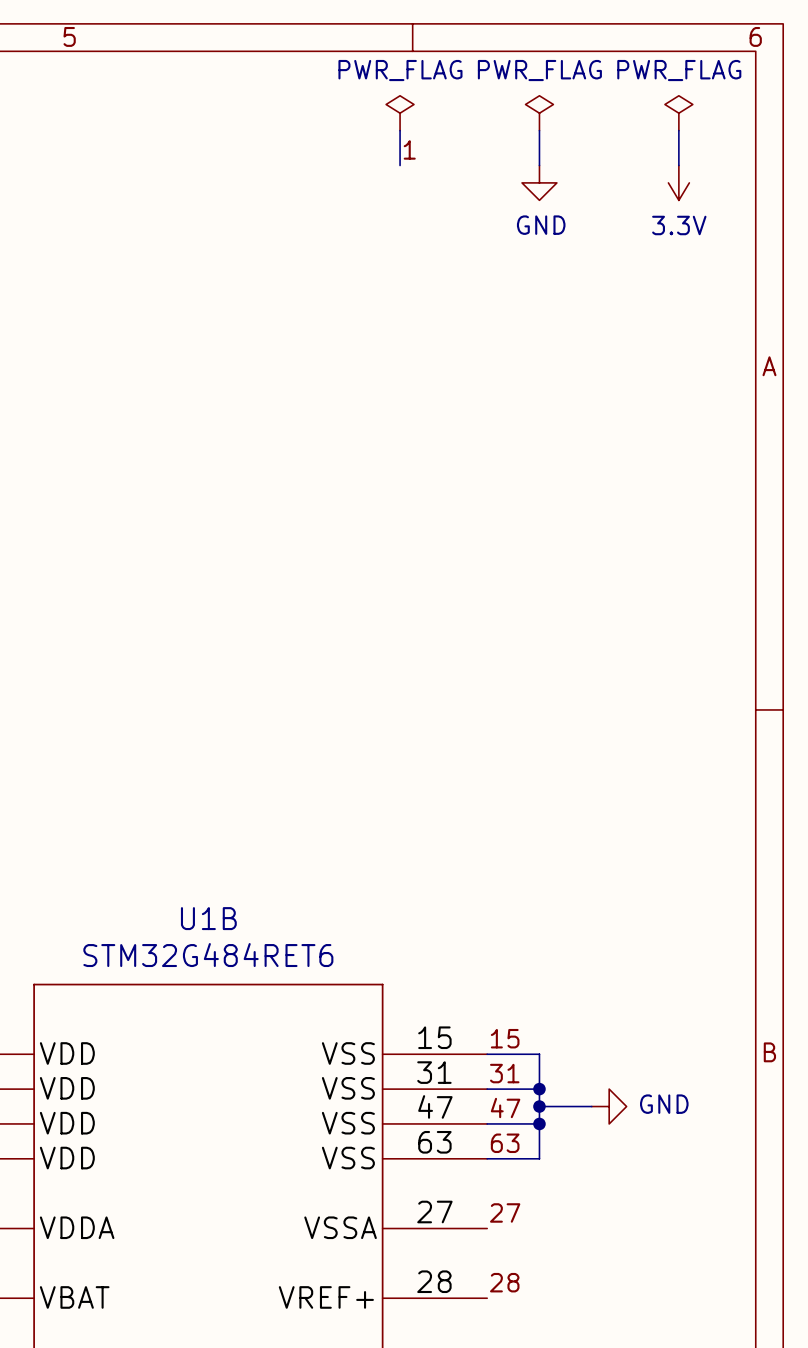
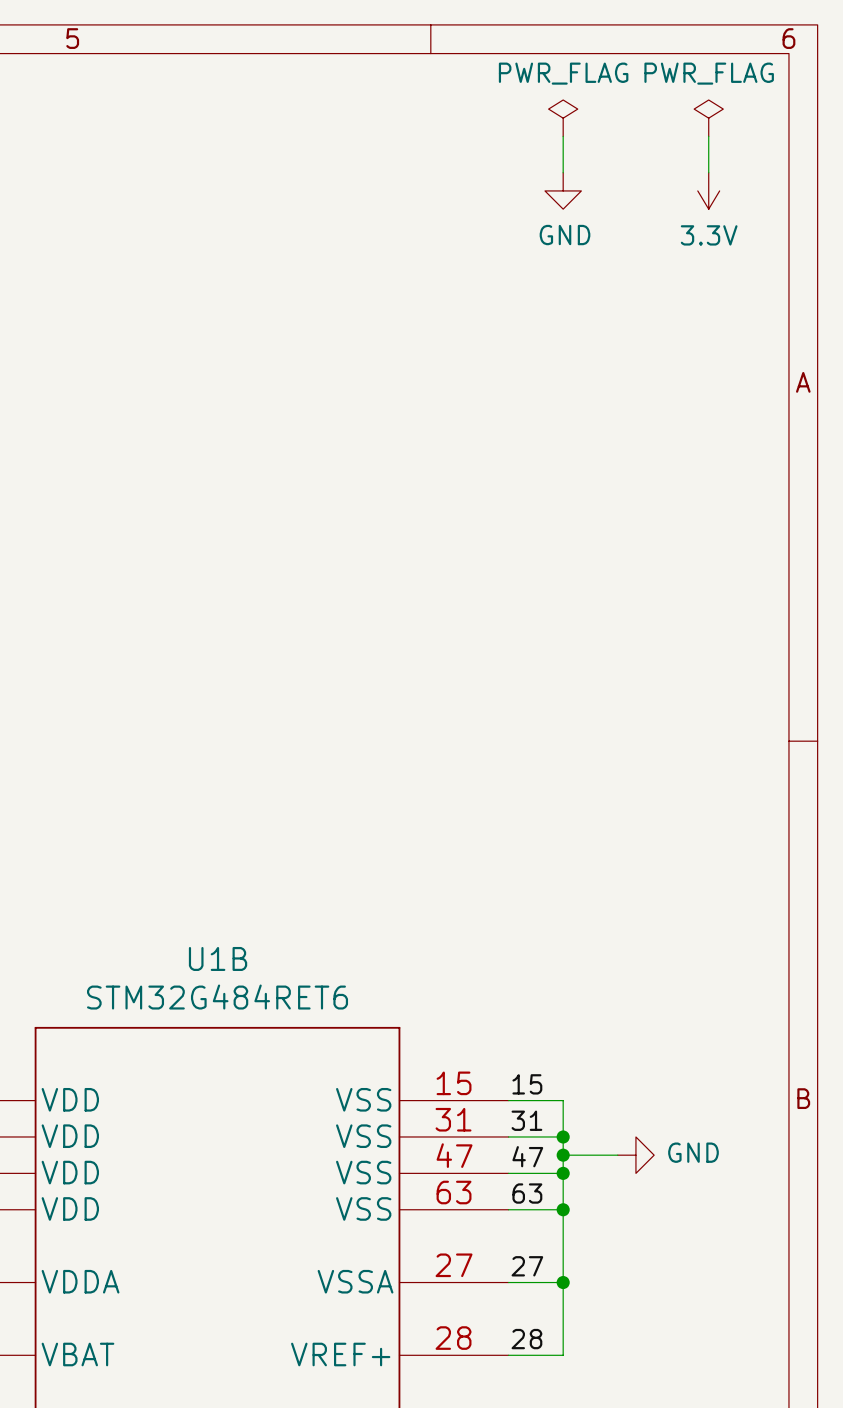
power symbol: PWR_FLAG (400, 113) -> none
wire: (400, 130) (400, 165) -> none
label: 1 (409, 149) -> none
wire: none -> (563, 1209) (563, 1355) (508, 1355)
junction: none -> (563, 1209)
wire: none -> (508, 1282) (563, 1282)
junction: none -> (563, 1282)

